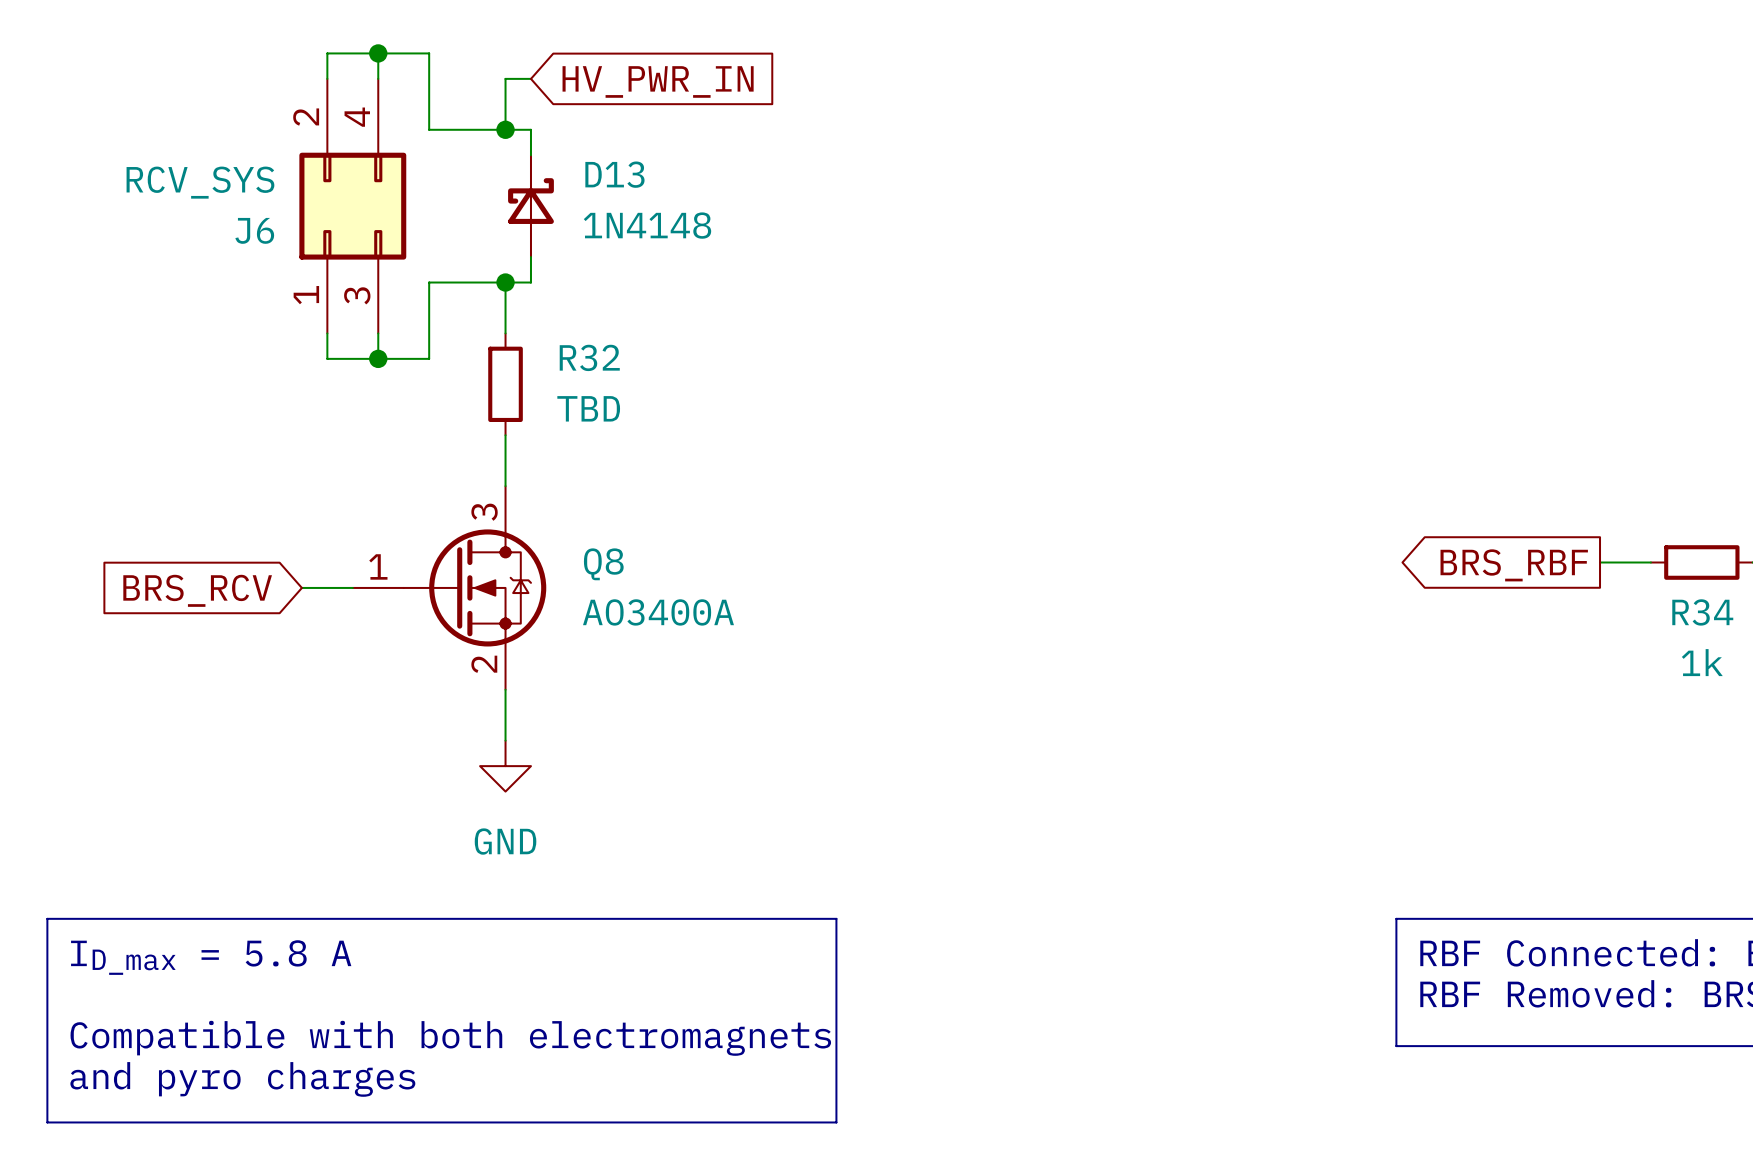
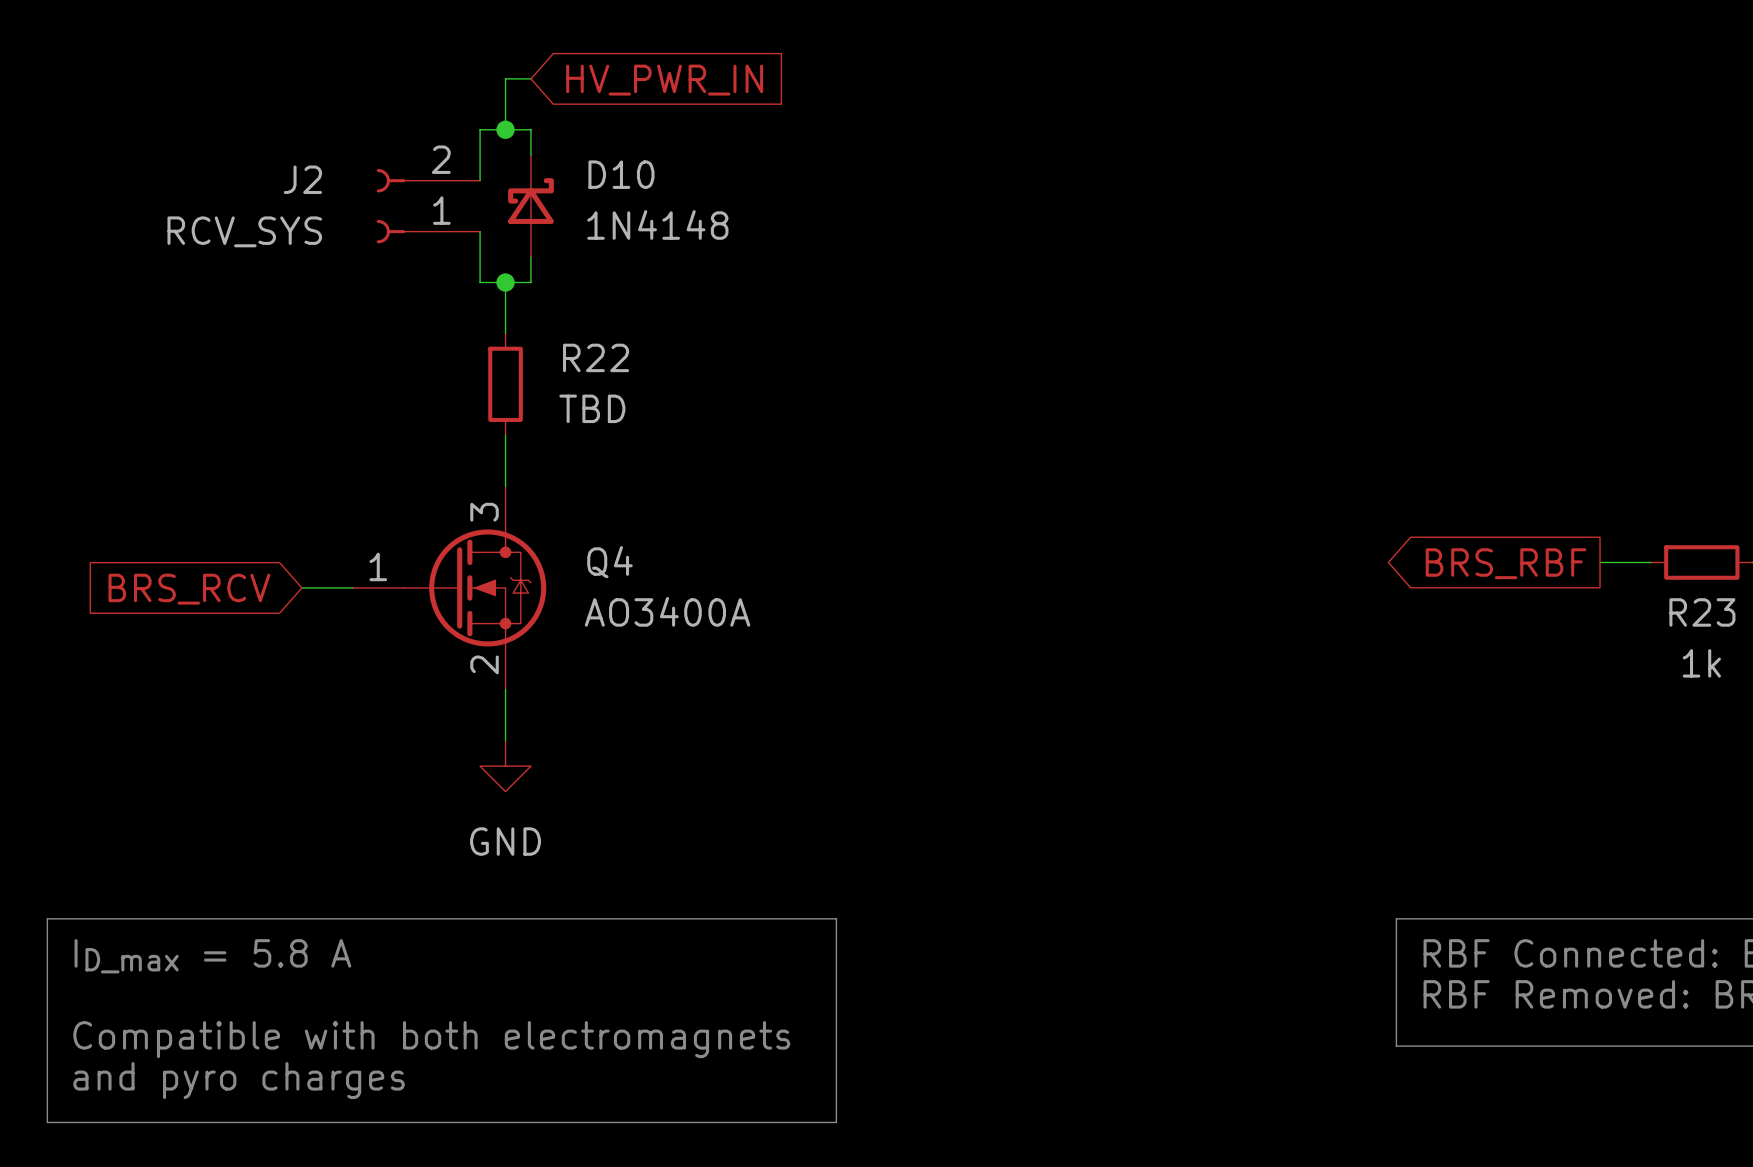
wire: (378, 53) (378, 78) -> none
junction: (378, 53) -> none
wire: (327, 78) (327, 53) (429, 53) (429, 129) (480, 129) -> (480, 180) (480, 129)
D13 name: D13 (614, 174) -> D10 (621, 174)
J6: RCV_SYS (352, 206) -> none
J2: none -> RCV_SYS (428, 206)
wire: (480, 282) (429, 282) (429, 358) (327, 358) (327, 333) -> (480, 282) (480, 231)
wire: (378, 333) (378, 358) -> none
R32 name: R32 (589, 357) -> R22 (596, 357)
junction: (378, 358) -> none
Q8 name: Q8 (603, 564) -> Q4 (609, 562)
R34 name: R34 (1702, 612) -> R23 (1702, 612)

